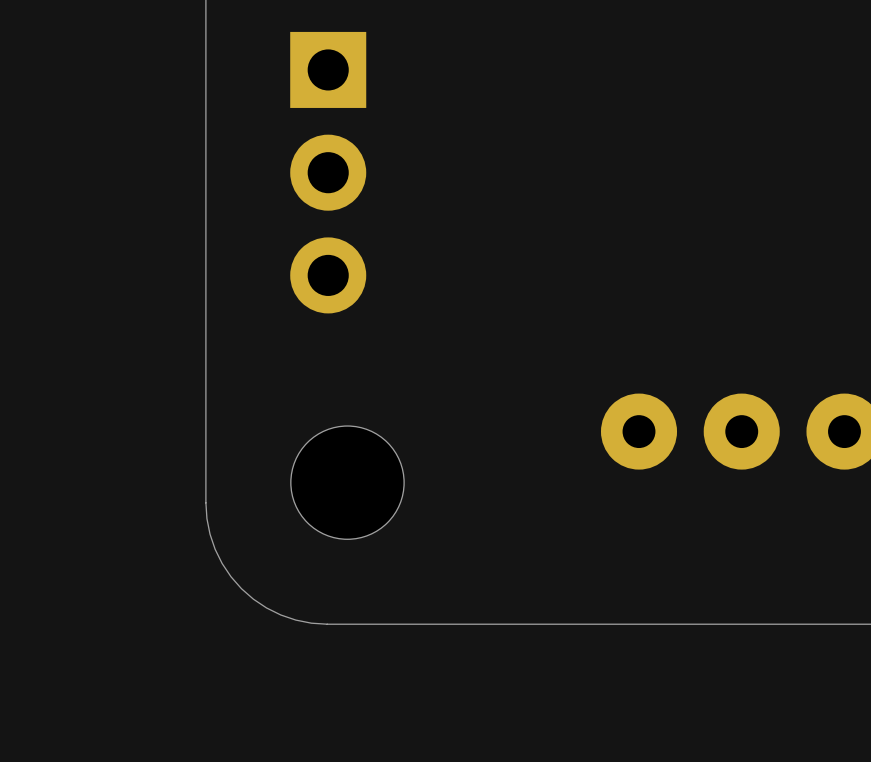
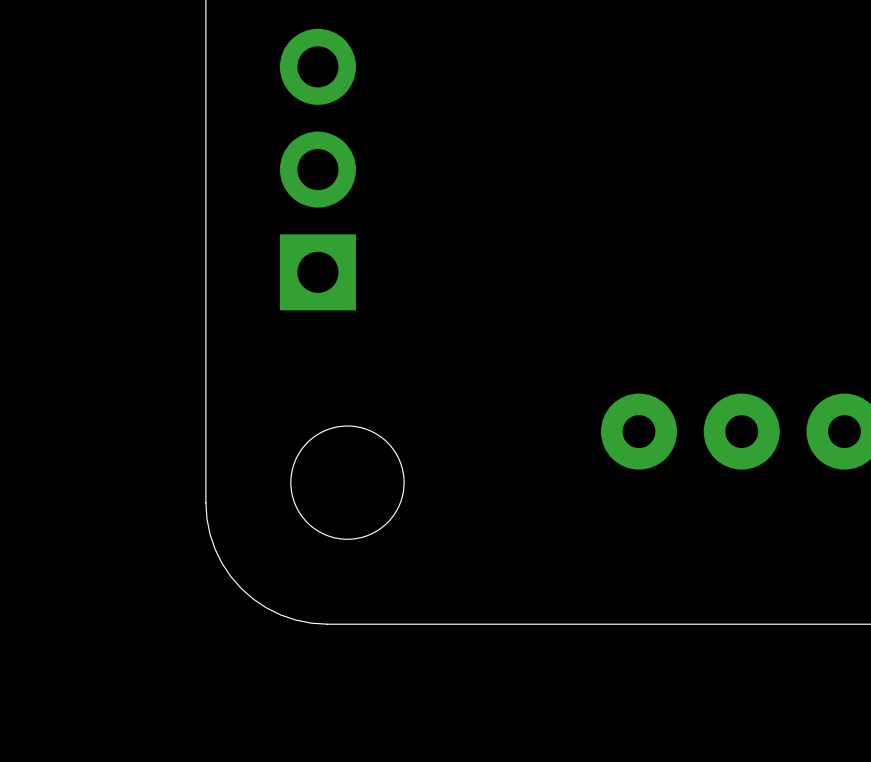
part rotation: 0° (328, 172) -> 180° (317, 169)

